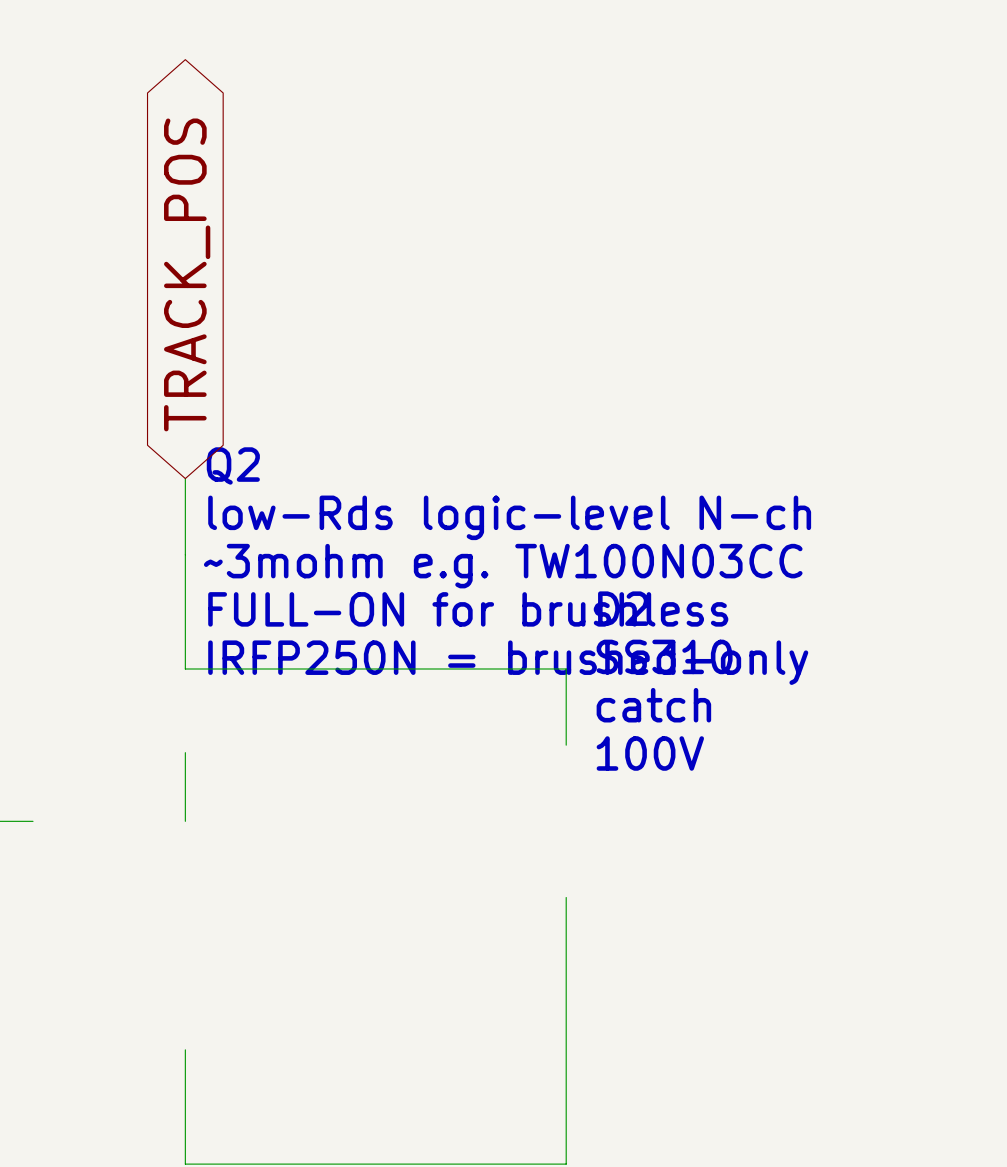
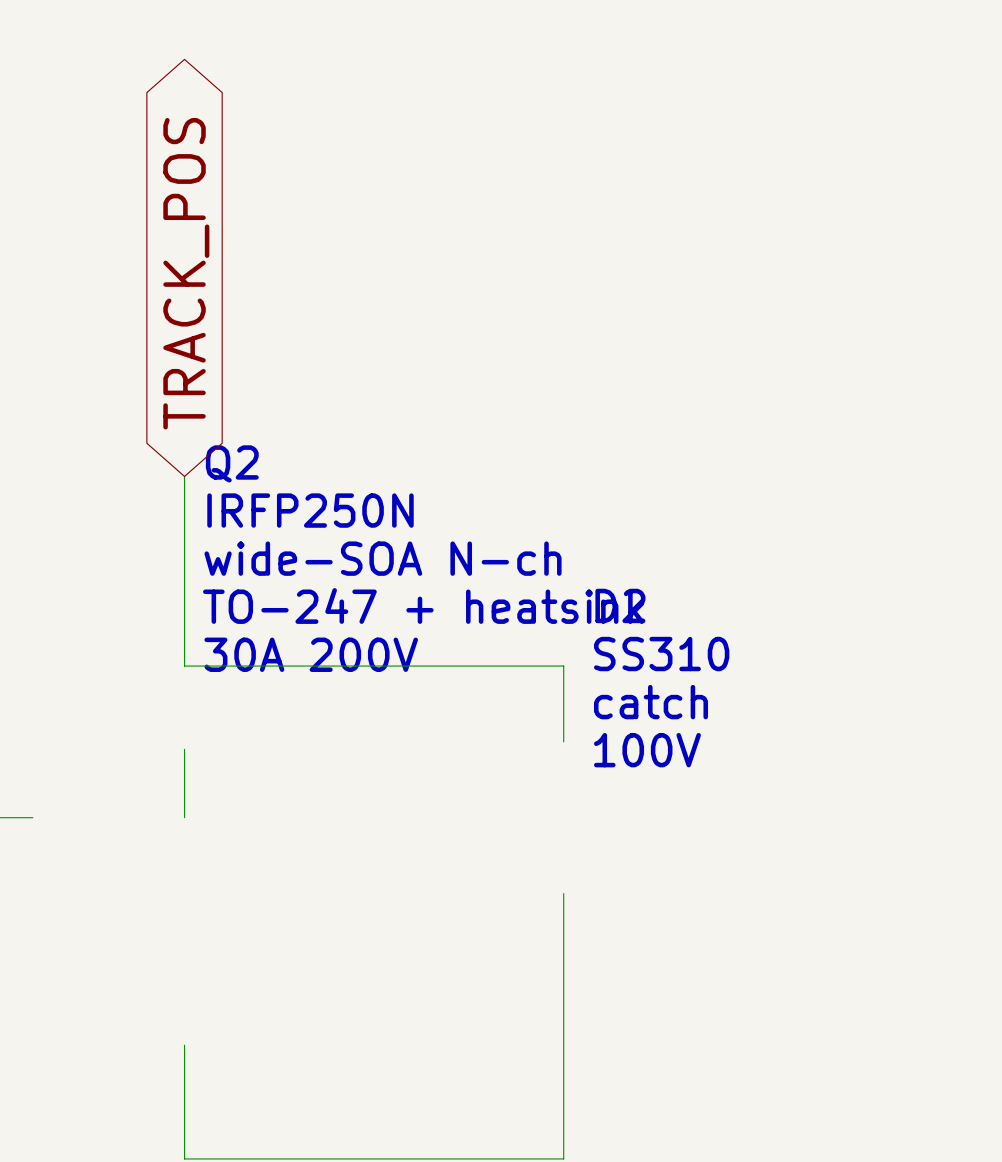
text: low-Rds logic-level N-ch (509, 517) -> IRFP250N (310, 510)
text: ~3mohm e.g. TW100N03CC (503, 566) -> wide-SOA N-ch (383, 558)
text: FULL-ON for brushless (468, 609) -> TO-247 + heatsink (423, 605)
text: IRFP250N = brushed-only (508, 662) -> 30A 200V (311, 654)

